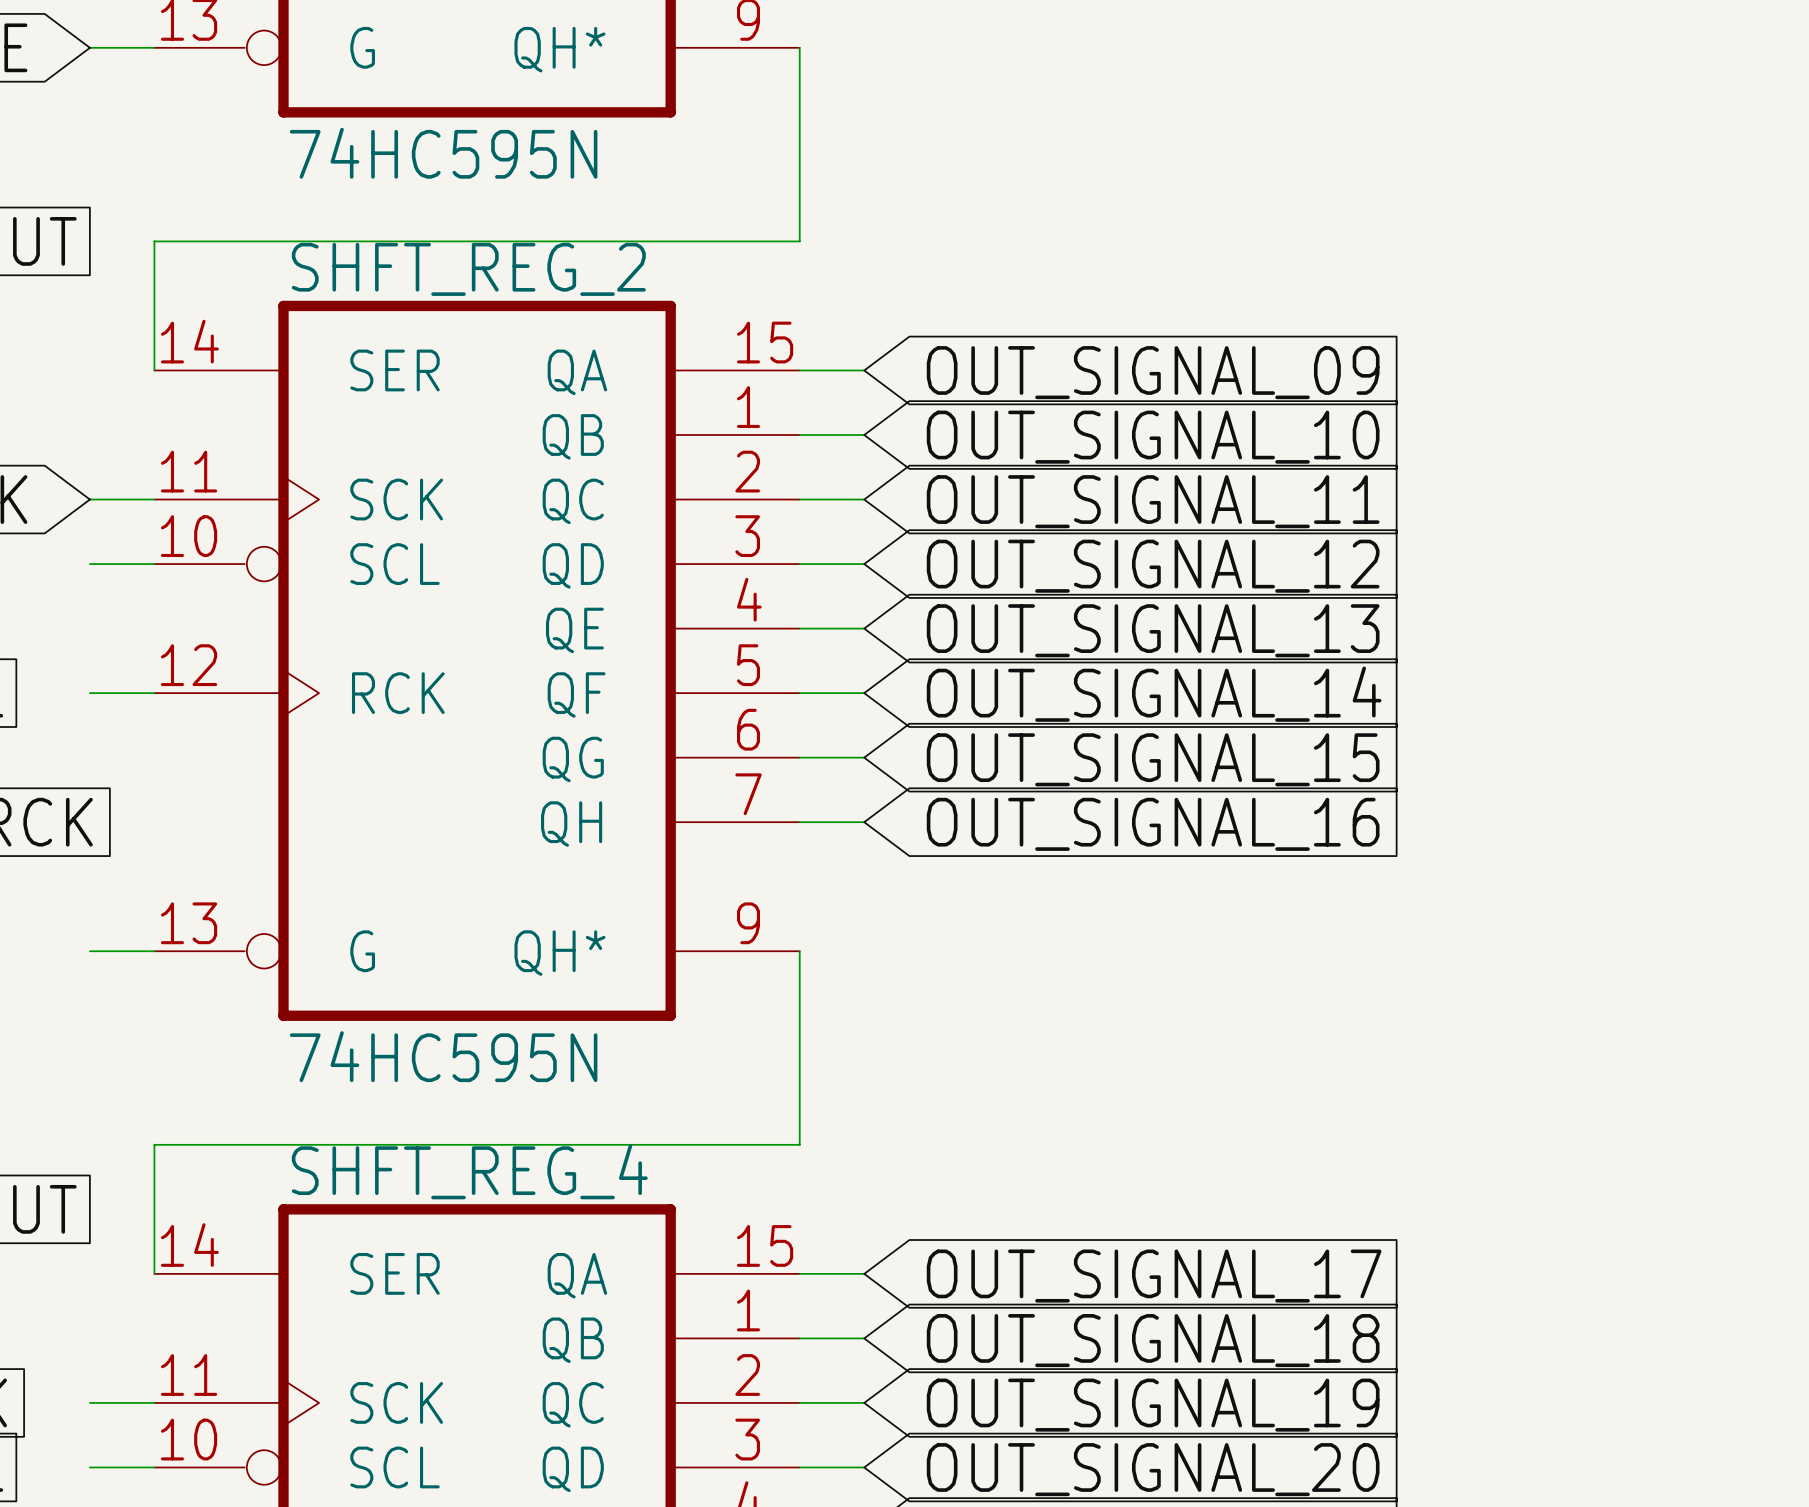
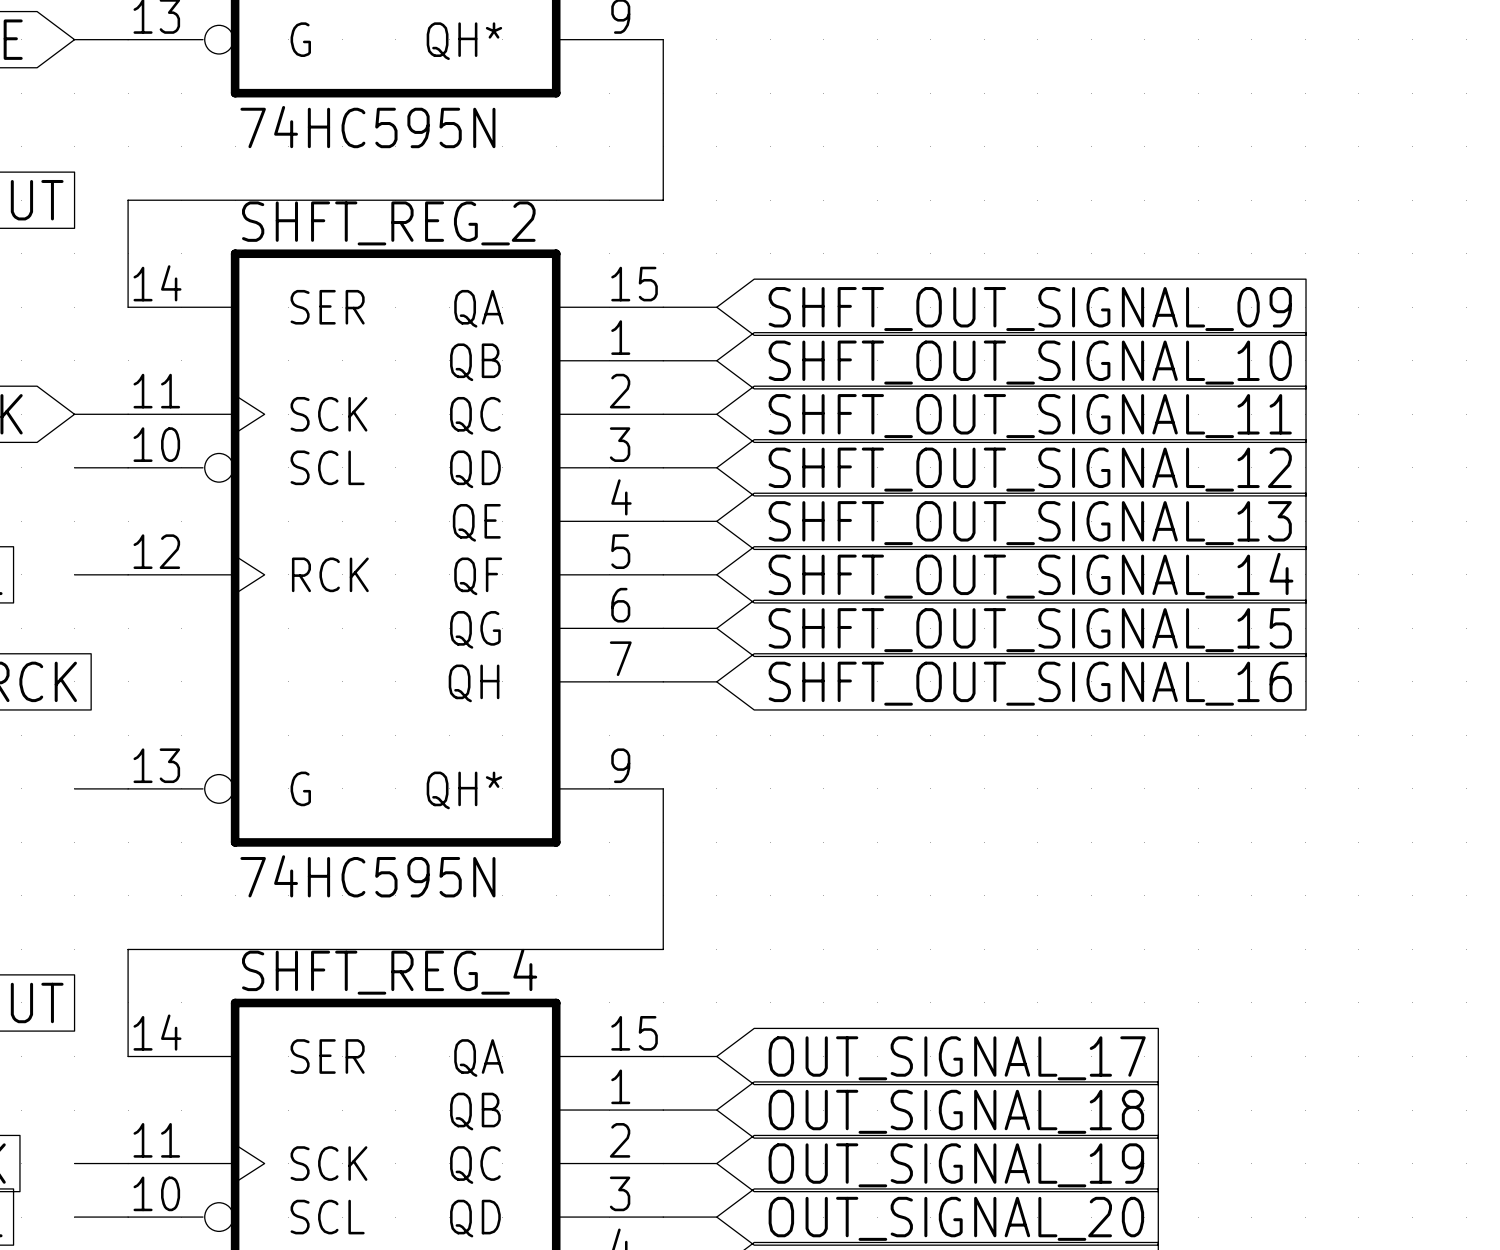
global label: OUT_SIGNAL_09 (1153, 372) -> SHFT_OUT_SIGNAL_09 (1030, 309)
global label: OUT_SIGNAL_10 (1153, 437) -> SHFT_OUT_SIGNAL_10 (1030, 362)
global label: OUT_SIGNAL_11 (1153, 501) -> SHFT_OUT_SIGNAL_11 (1030, 416)
global label: OUT_SIGNAL_12 (1153, 566) -> SHFT_OUT_SIGNAL_12 (1030, 469)
global label: OUT_SIGNAL_13 (1153, 630) -> SHFT_OUT_SIGNAL_13 (1030, 523)
global label: OUT_SIGNAL_14 (1154, 694) -> SHFT_OUT_SIGNAL_14 (1031, 575)
global label: OUT_SIGNAL_15 (1153, 759) -> SHFT_OUT_SIGNAL_15 (1030, 630)
global label: OUT_SIGNAL_16 (1153, 824) -> SHFT_OUT_SIGNAL_16 (1030, 683)

